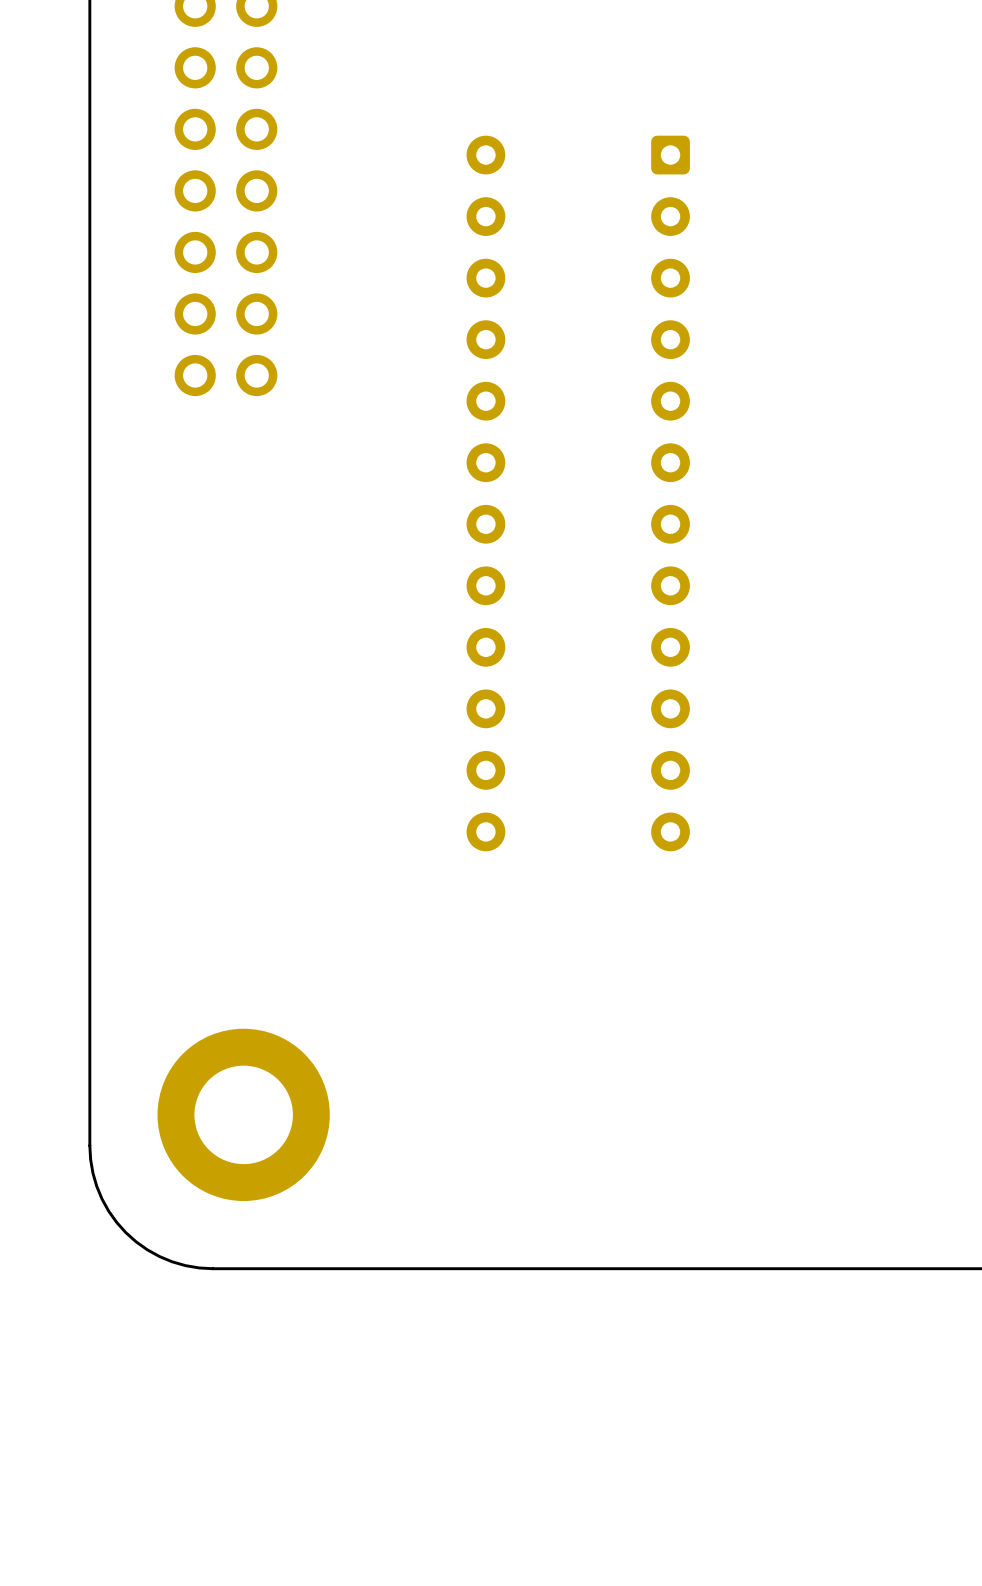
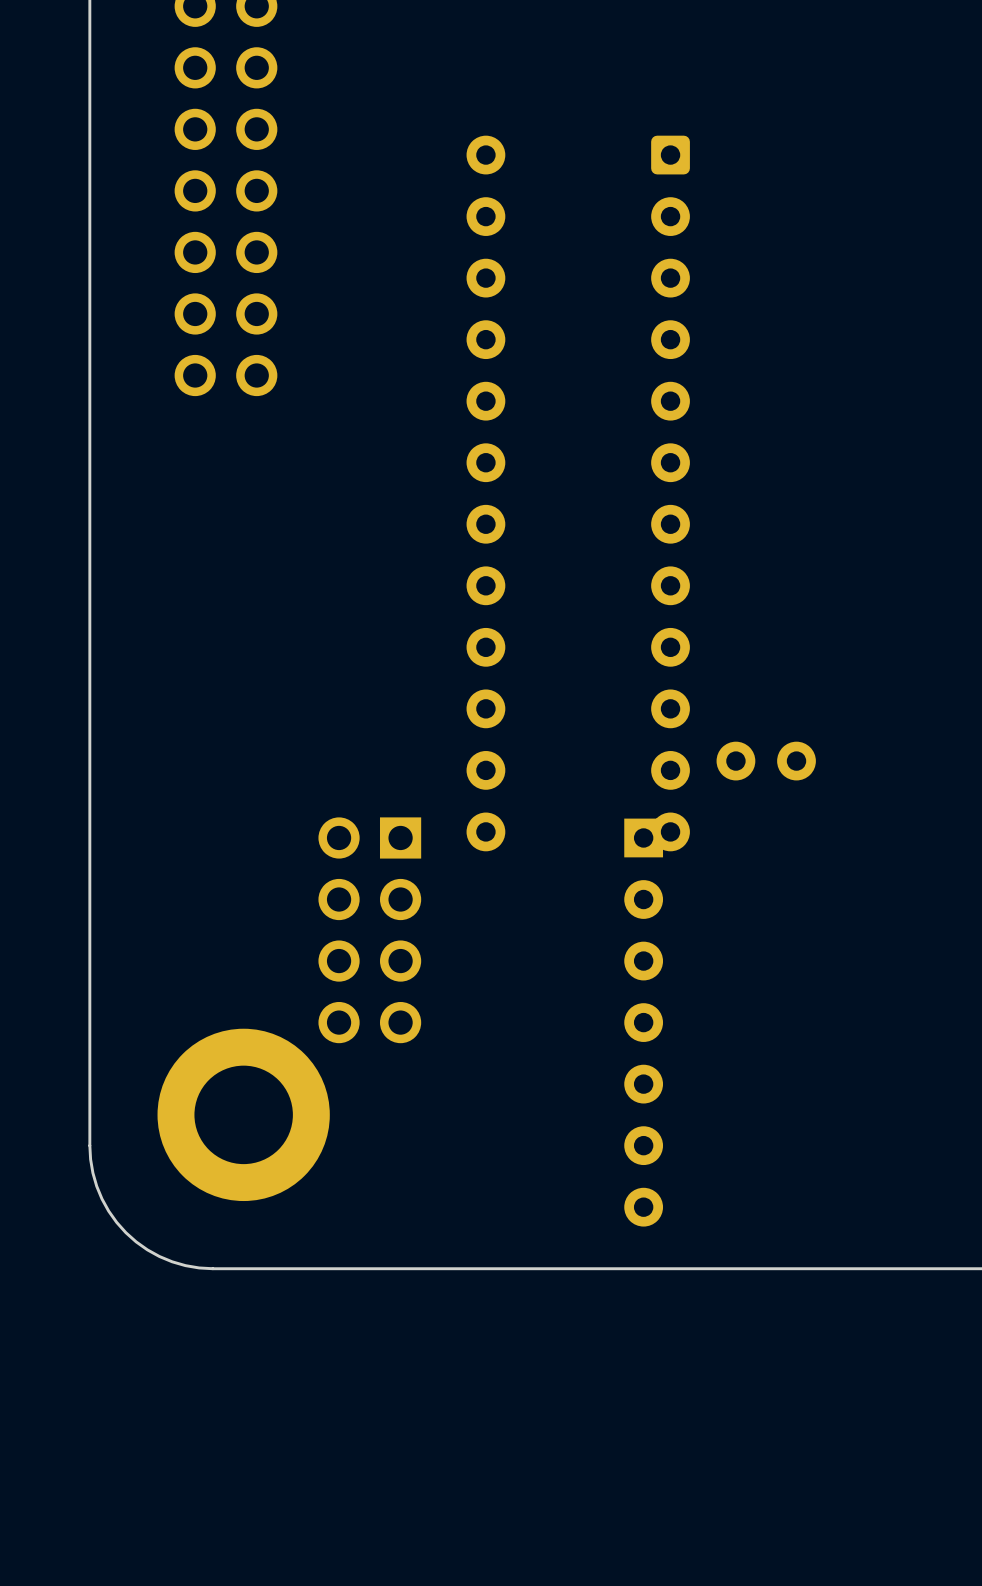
part: none -> (766, 761)
part: none -> (369, 930)
part: none -> (643, 1022)

